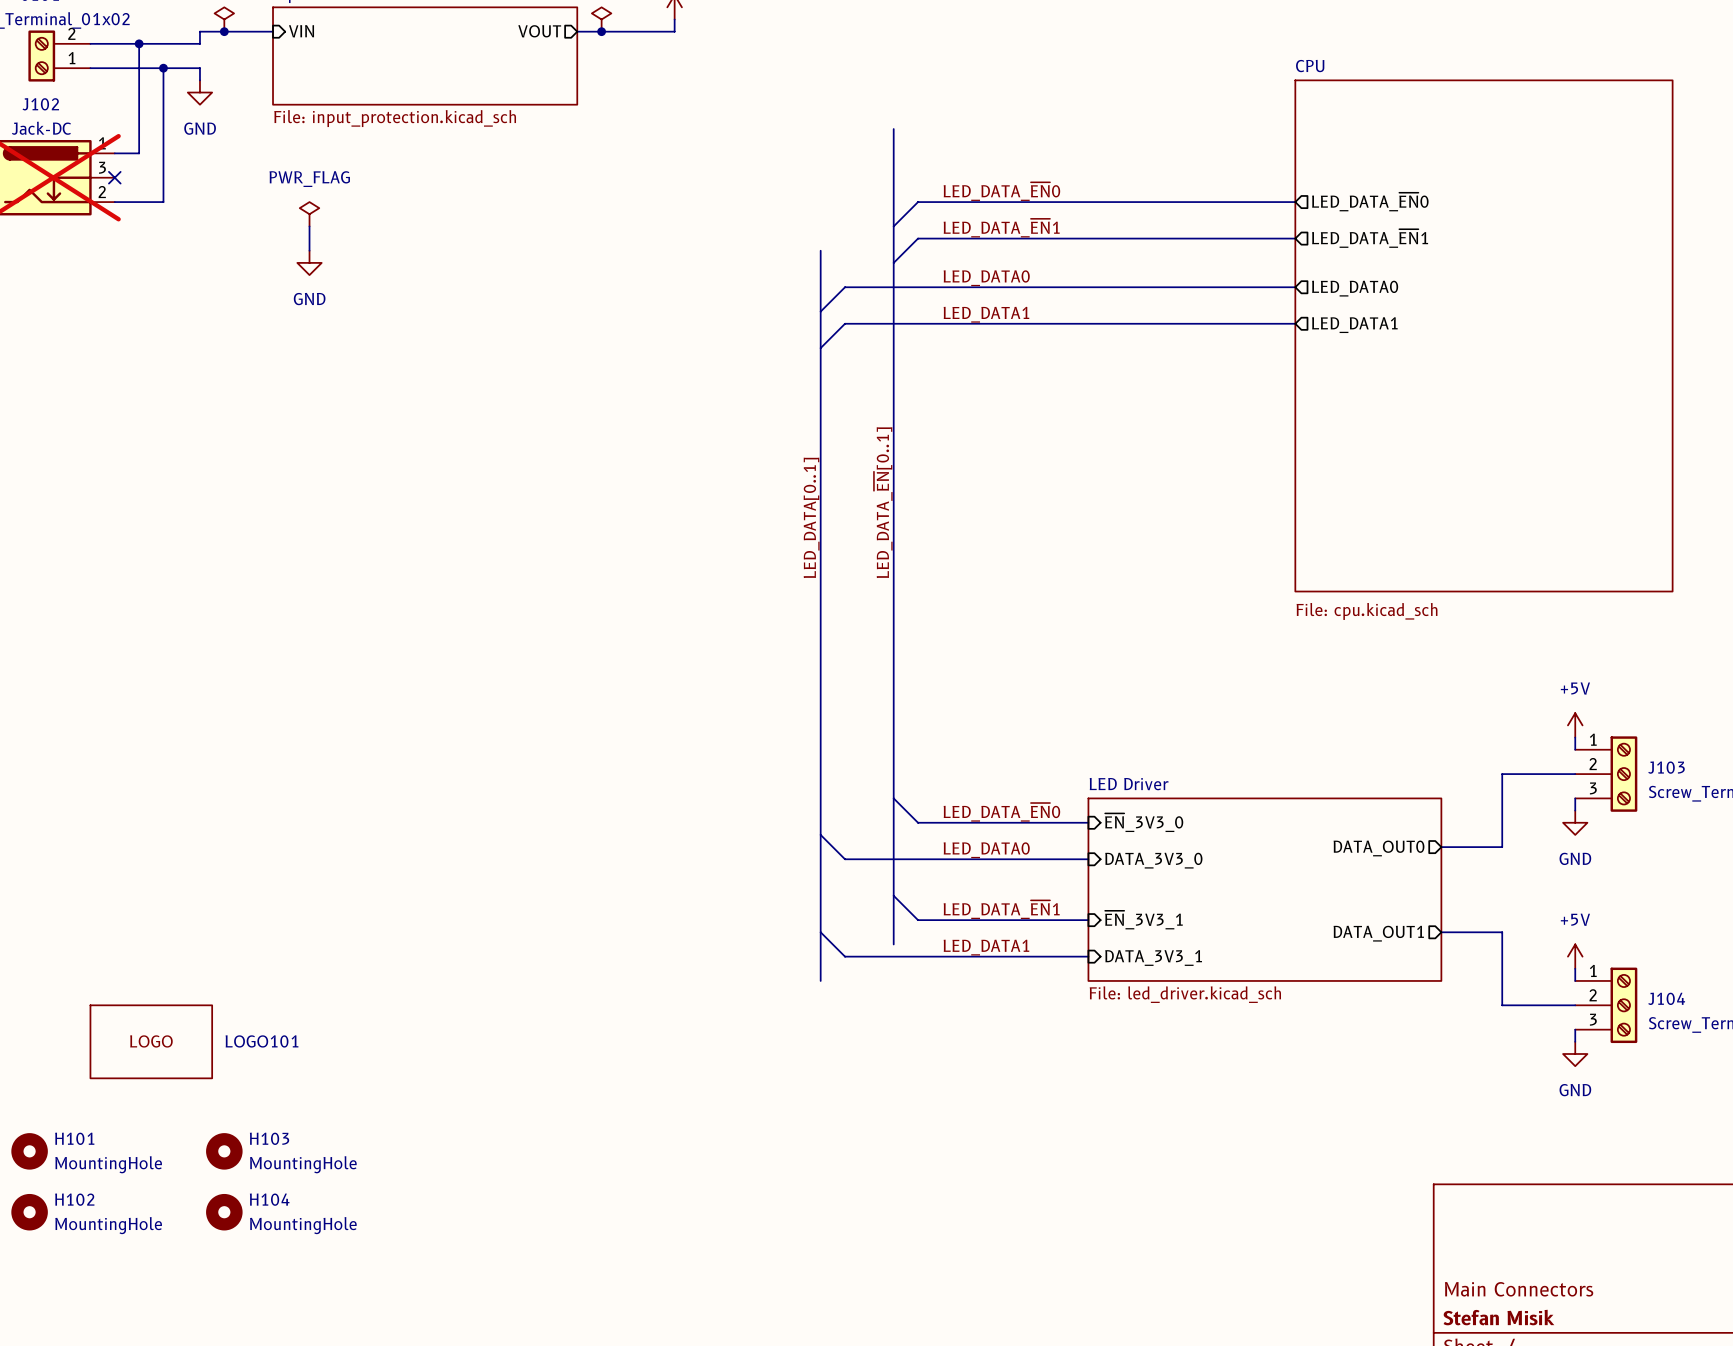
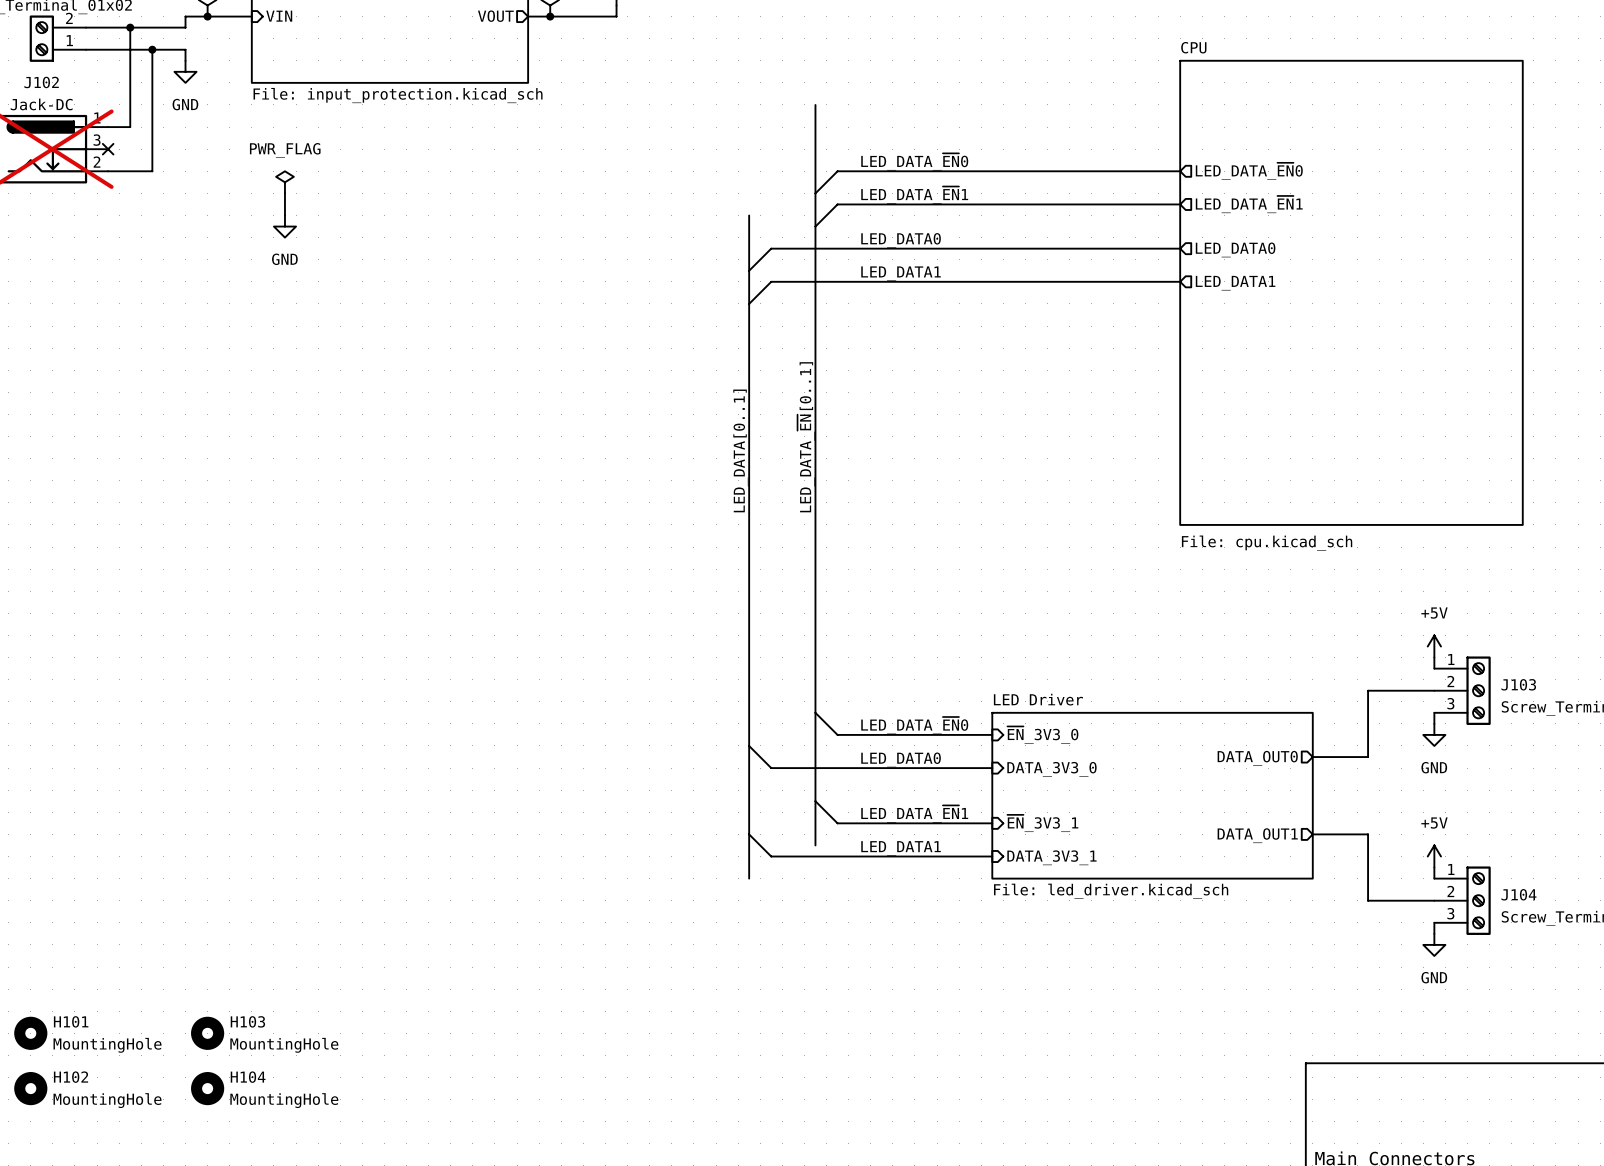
LOGO101: (151, 1041) -> none

